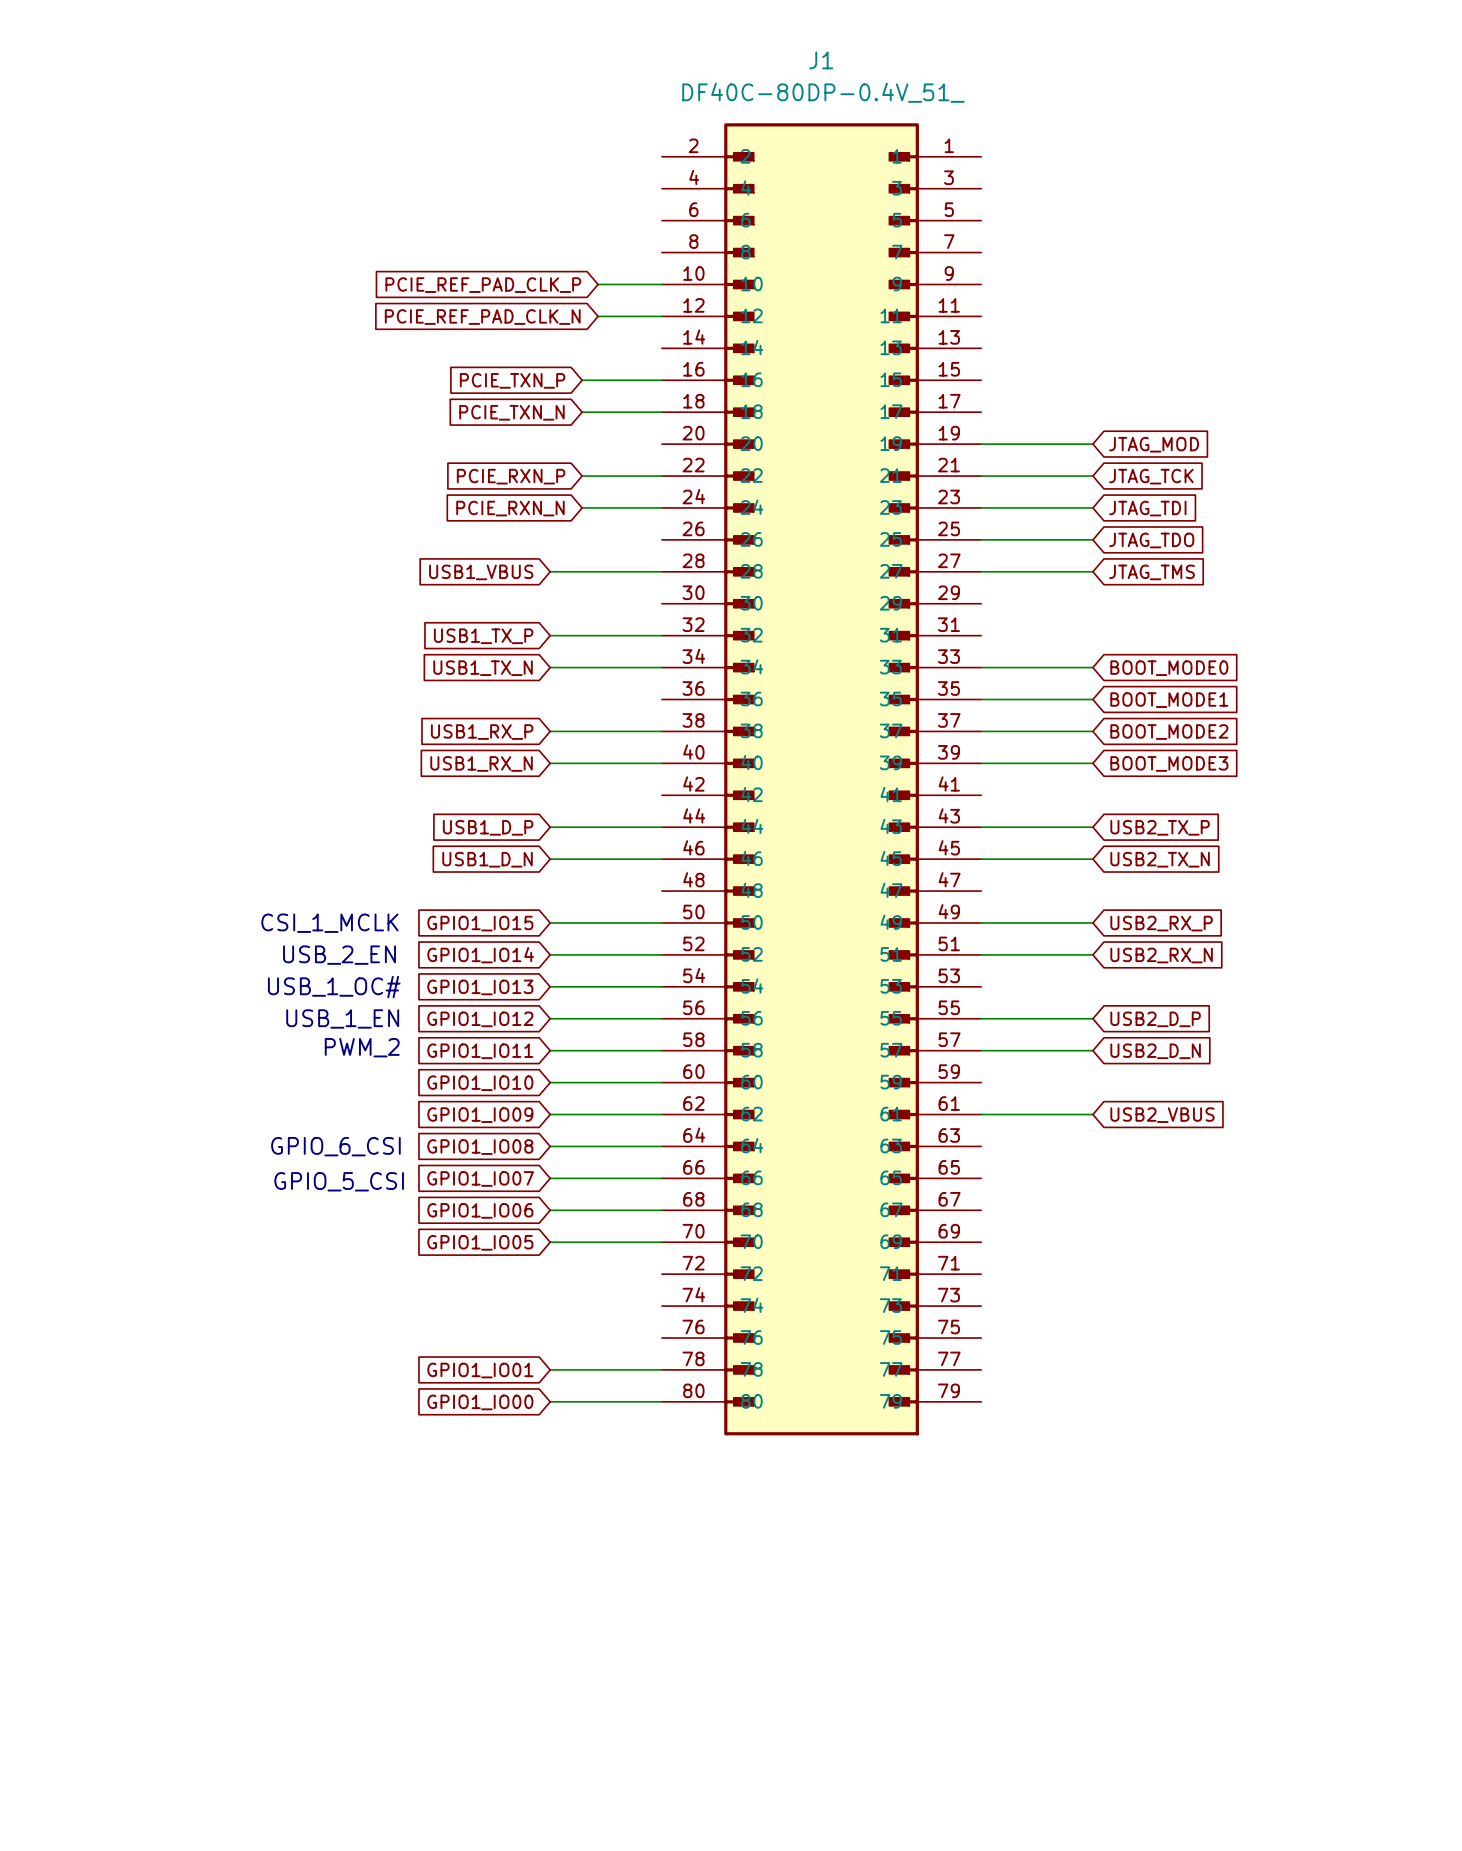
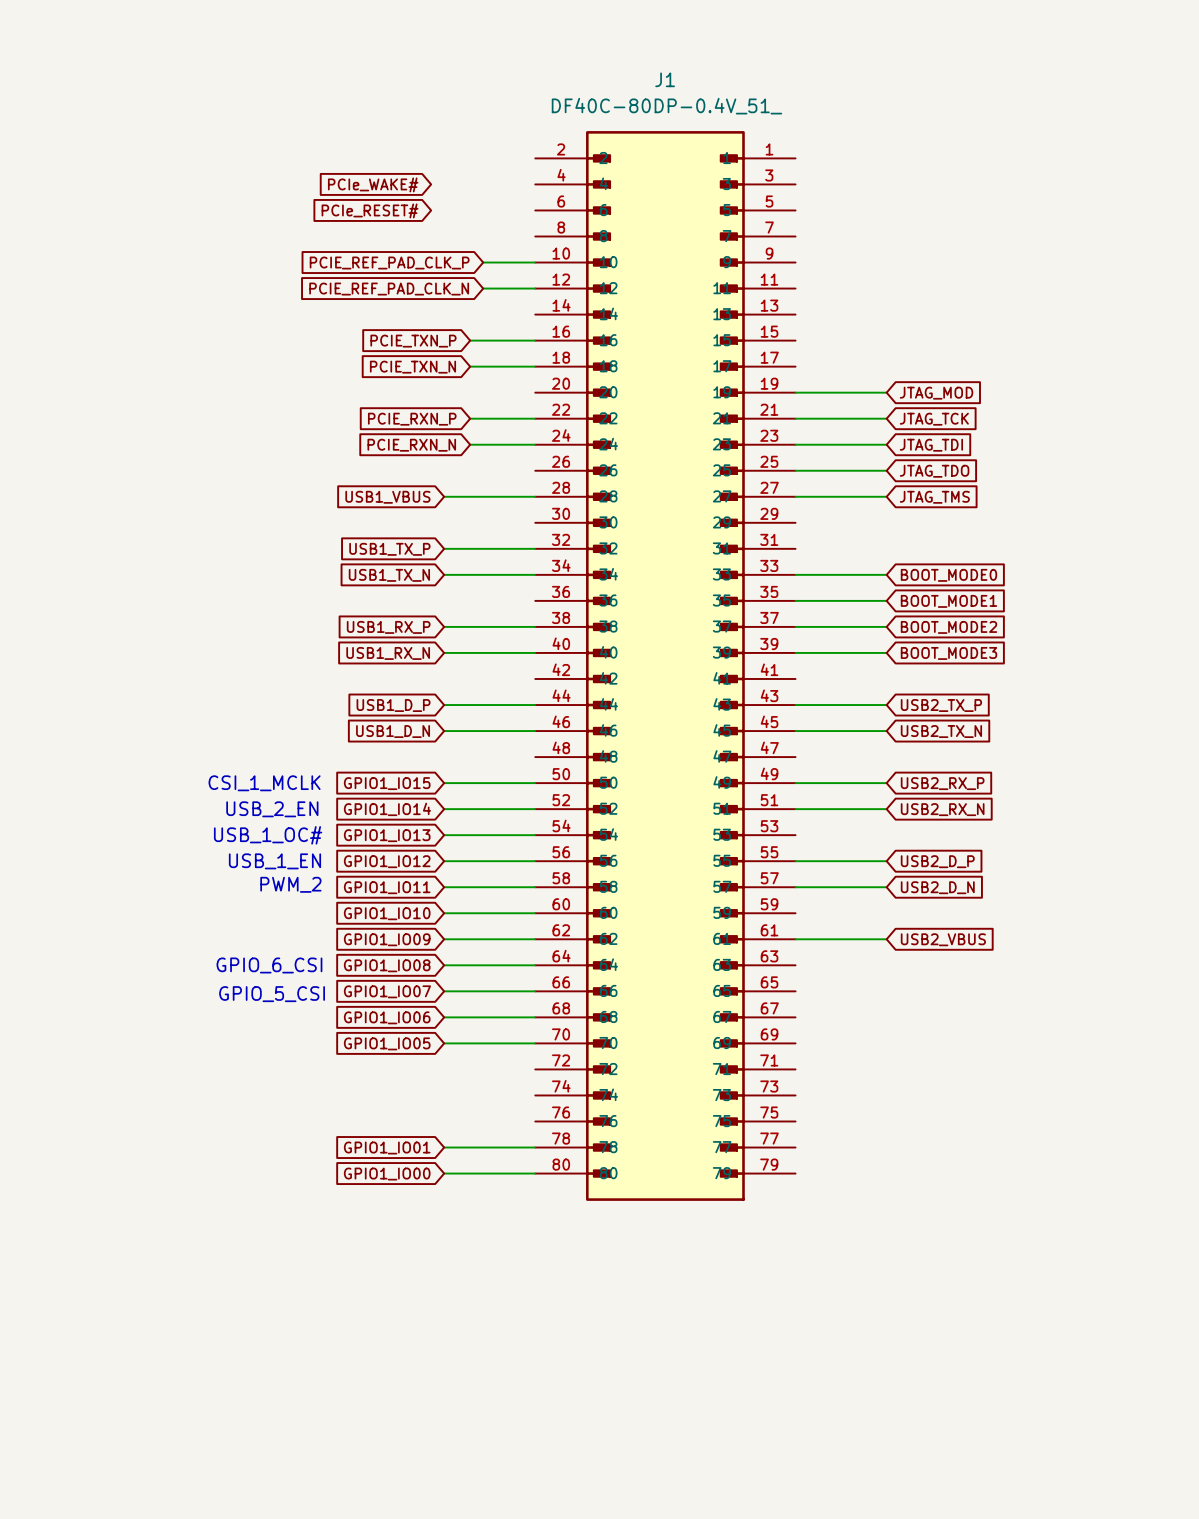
global label: none -> PCIe_WAKE# (373, 184)
global label: none -> PCIe_RESET# (370, 210)

